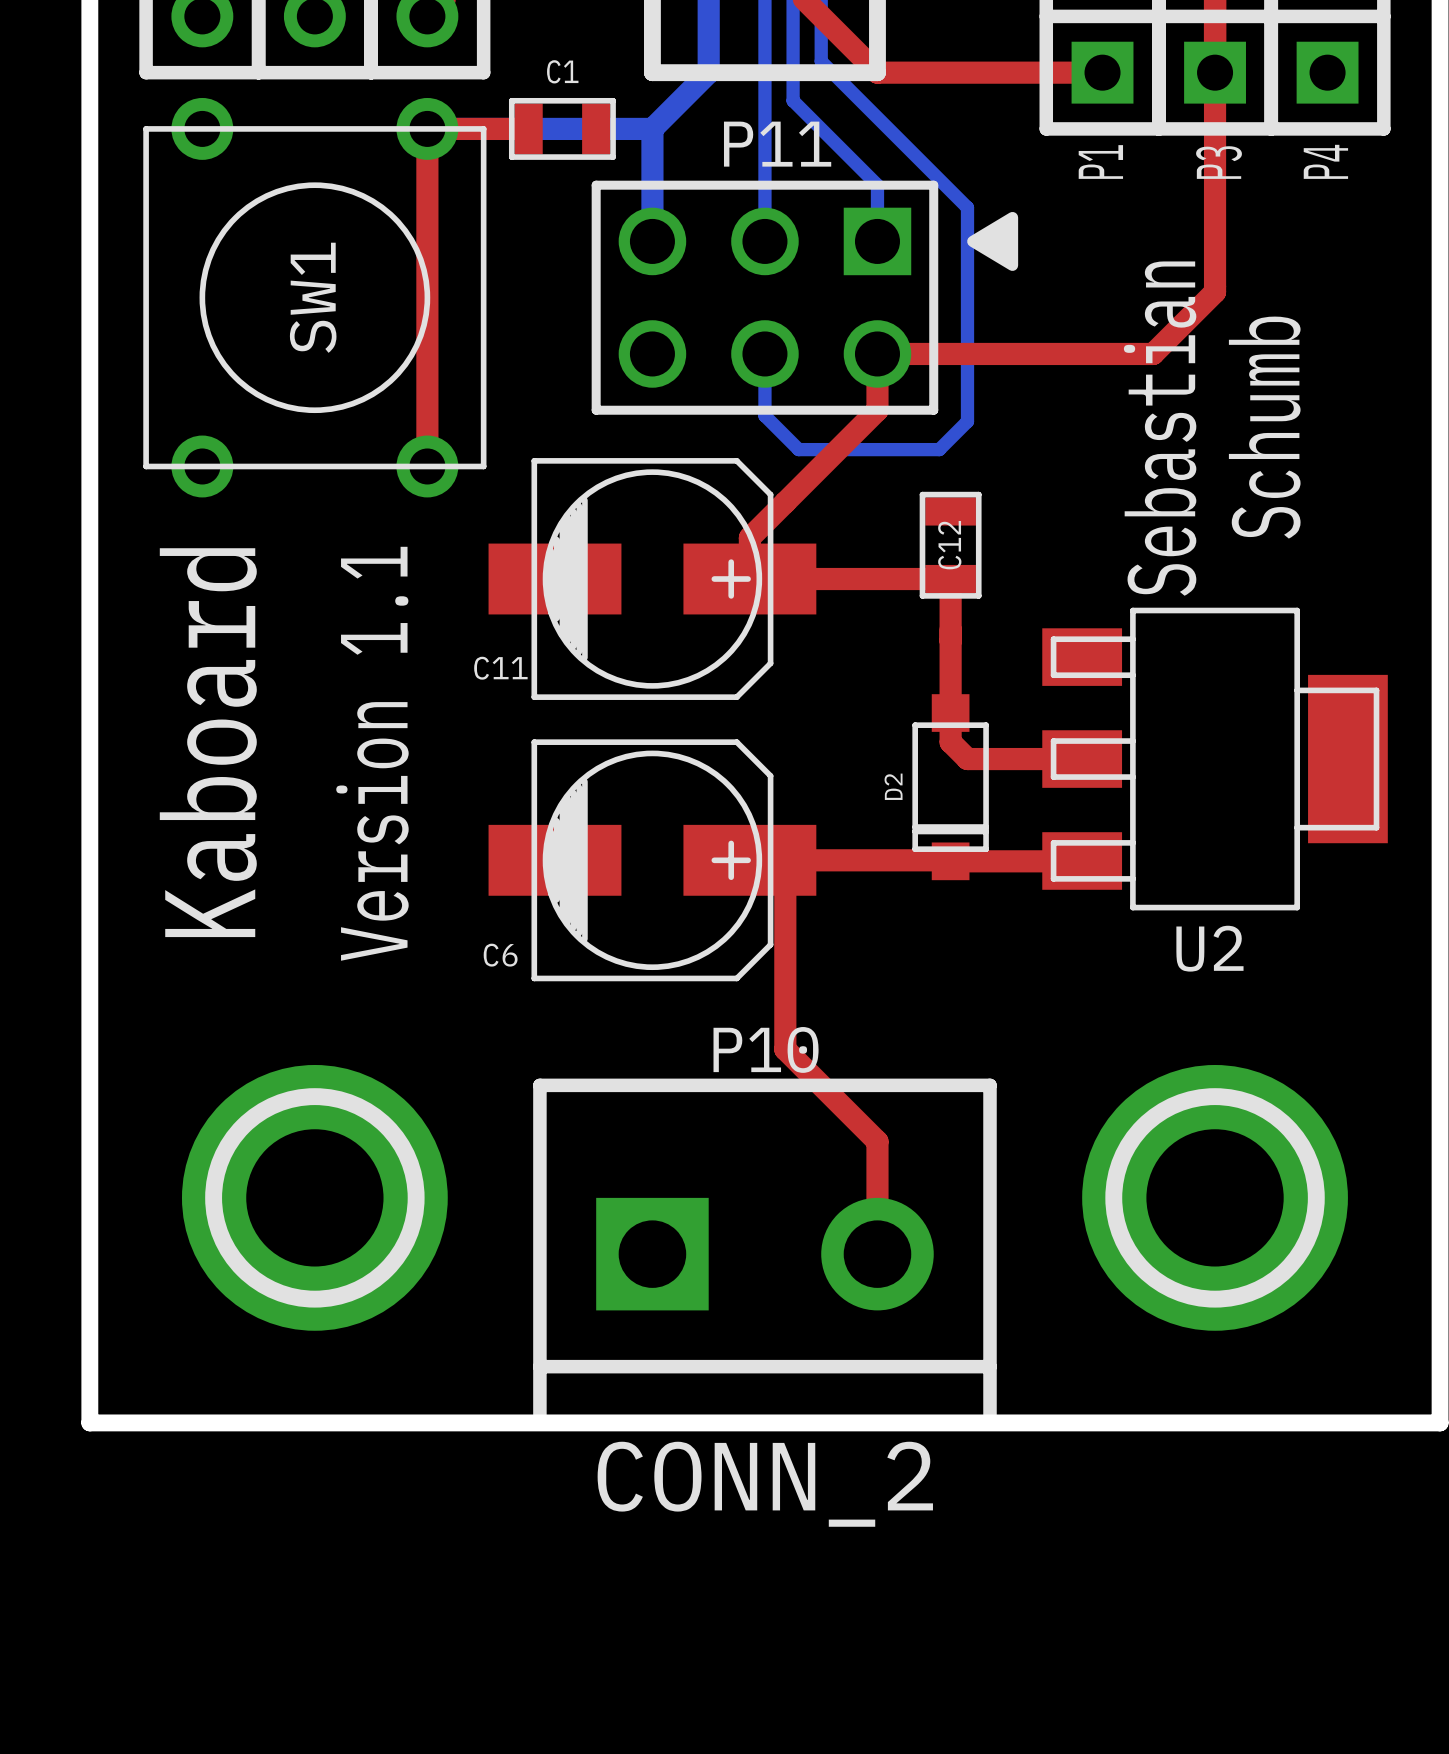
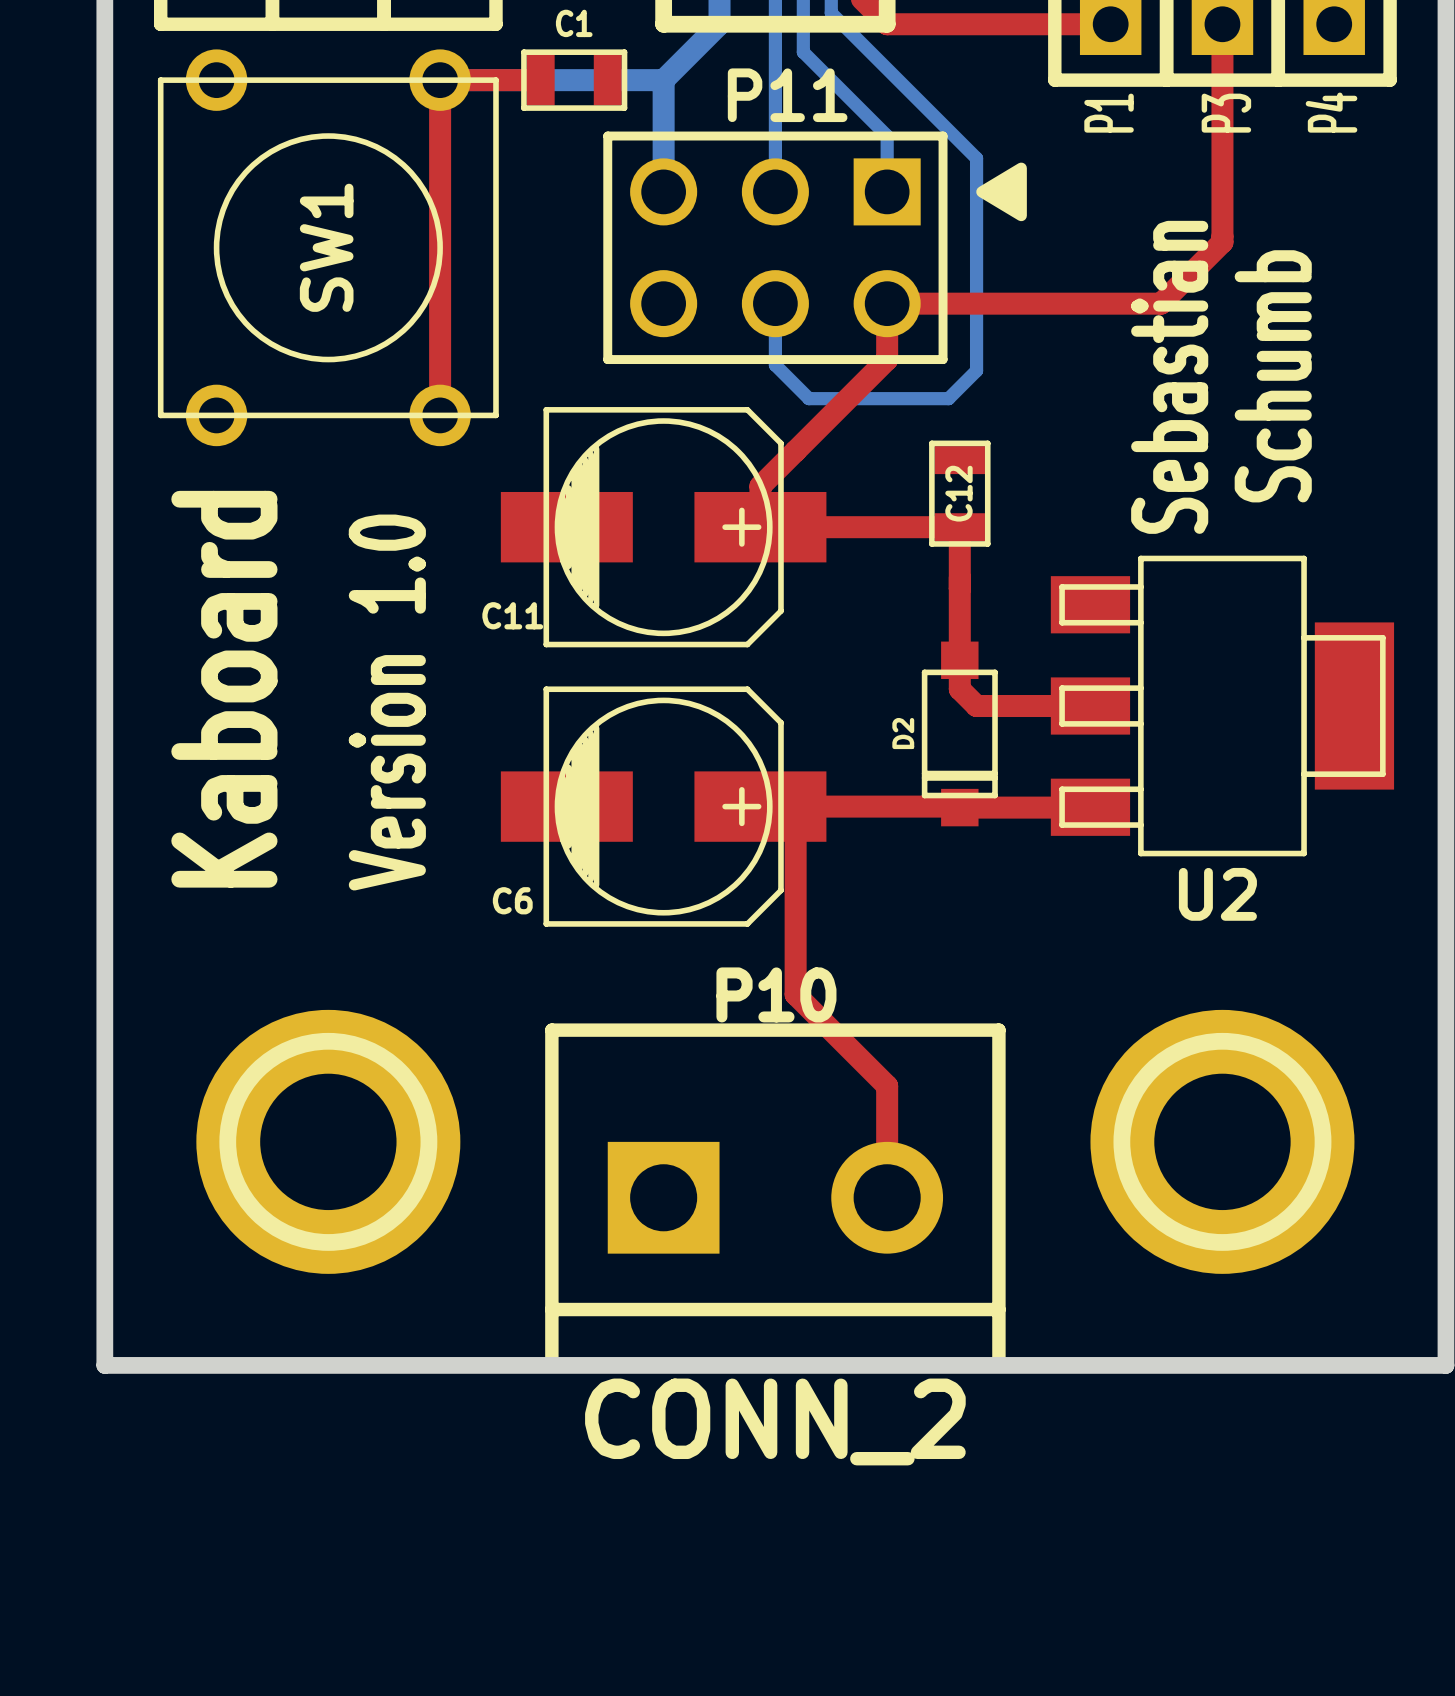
text: Version 1.1 (372, 753) -> Version 1.0 (387, 702)

